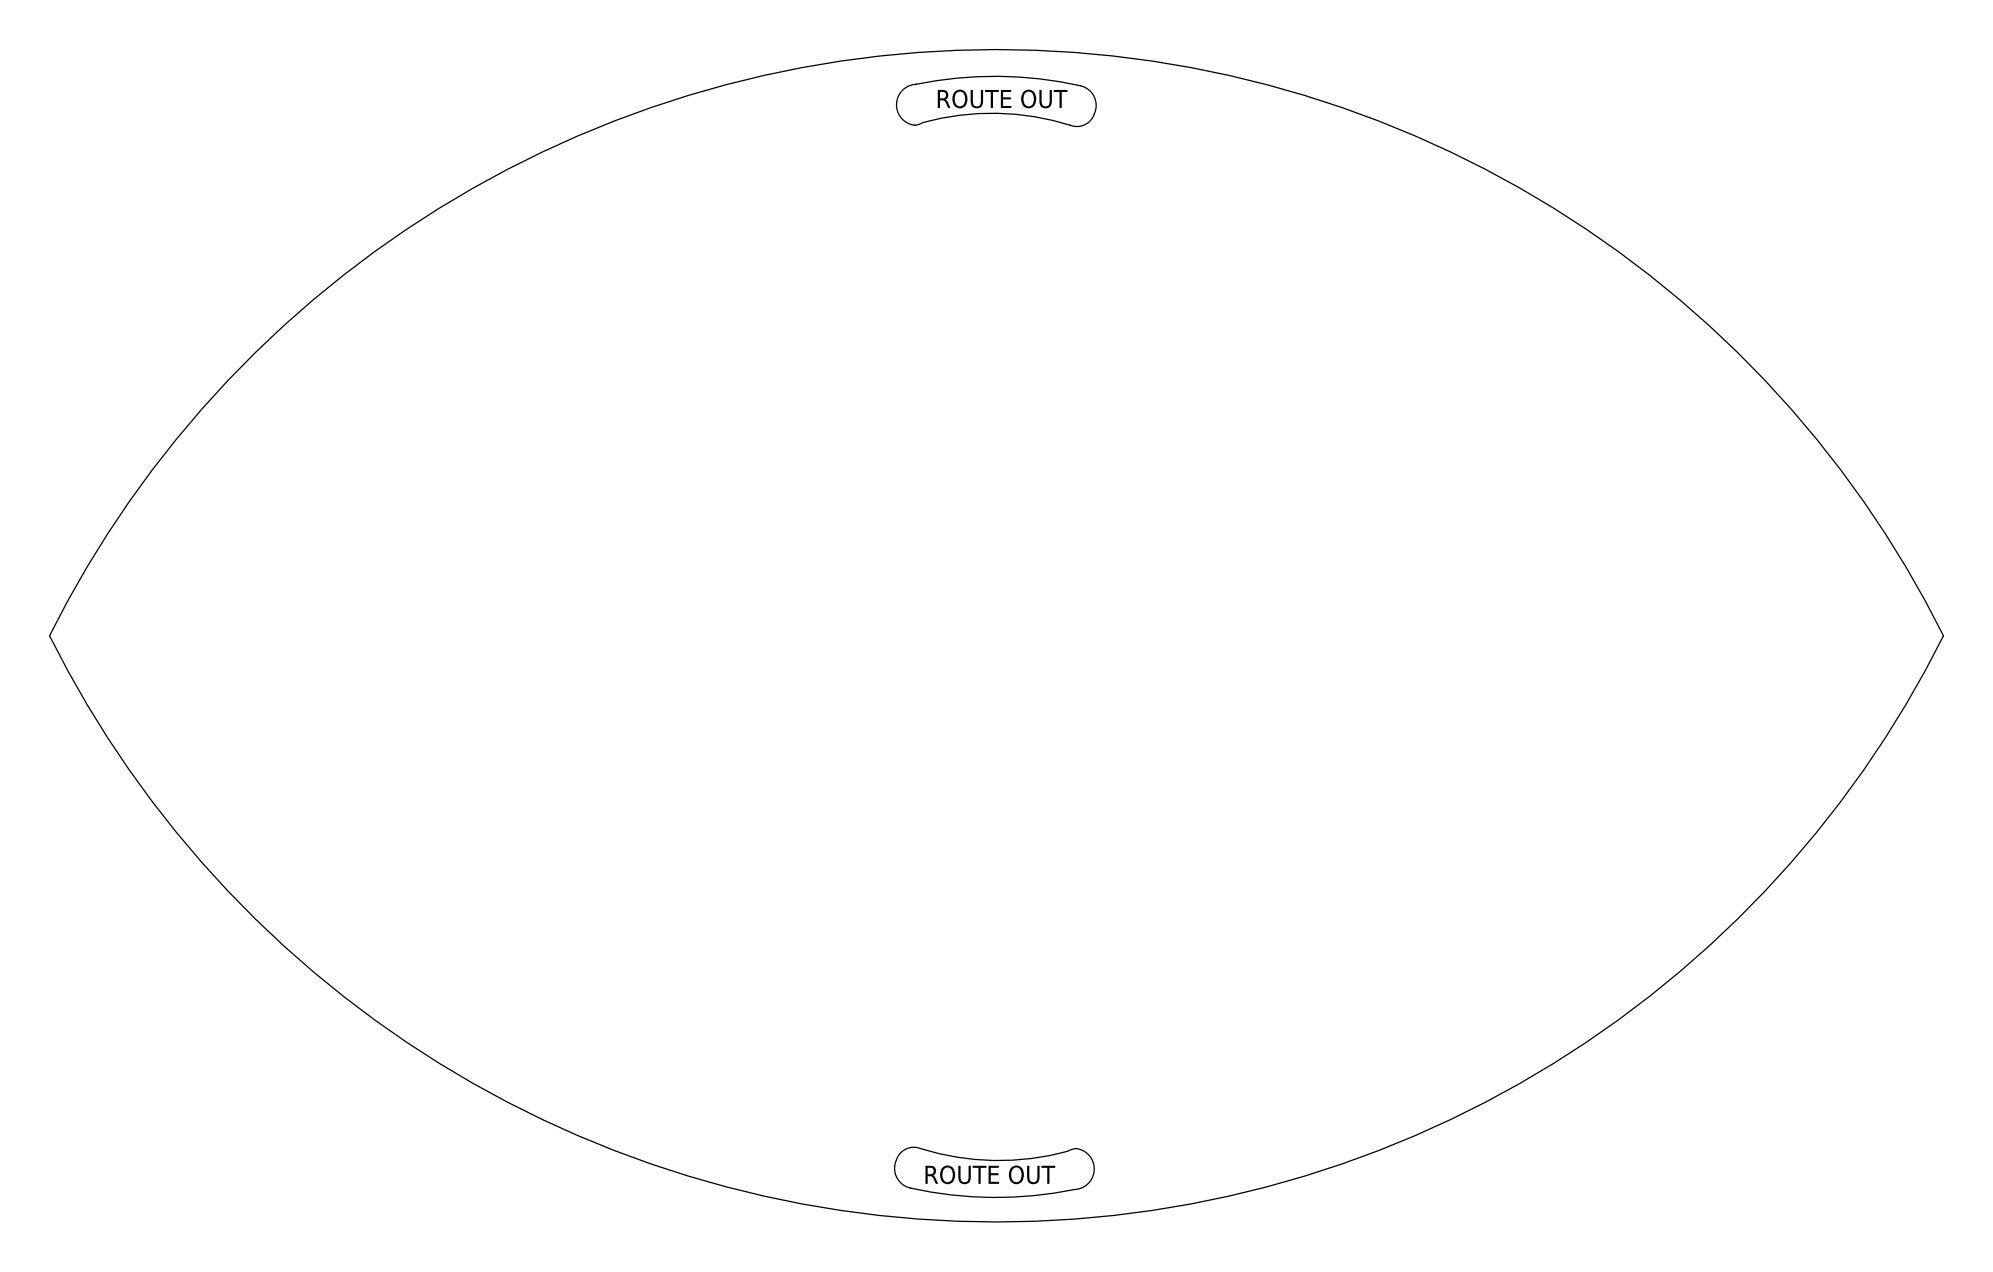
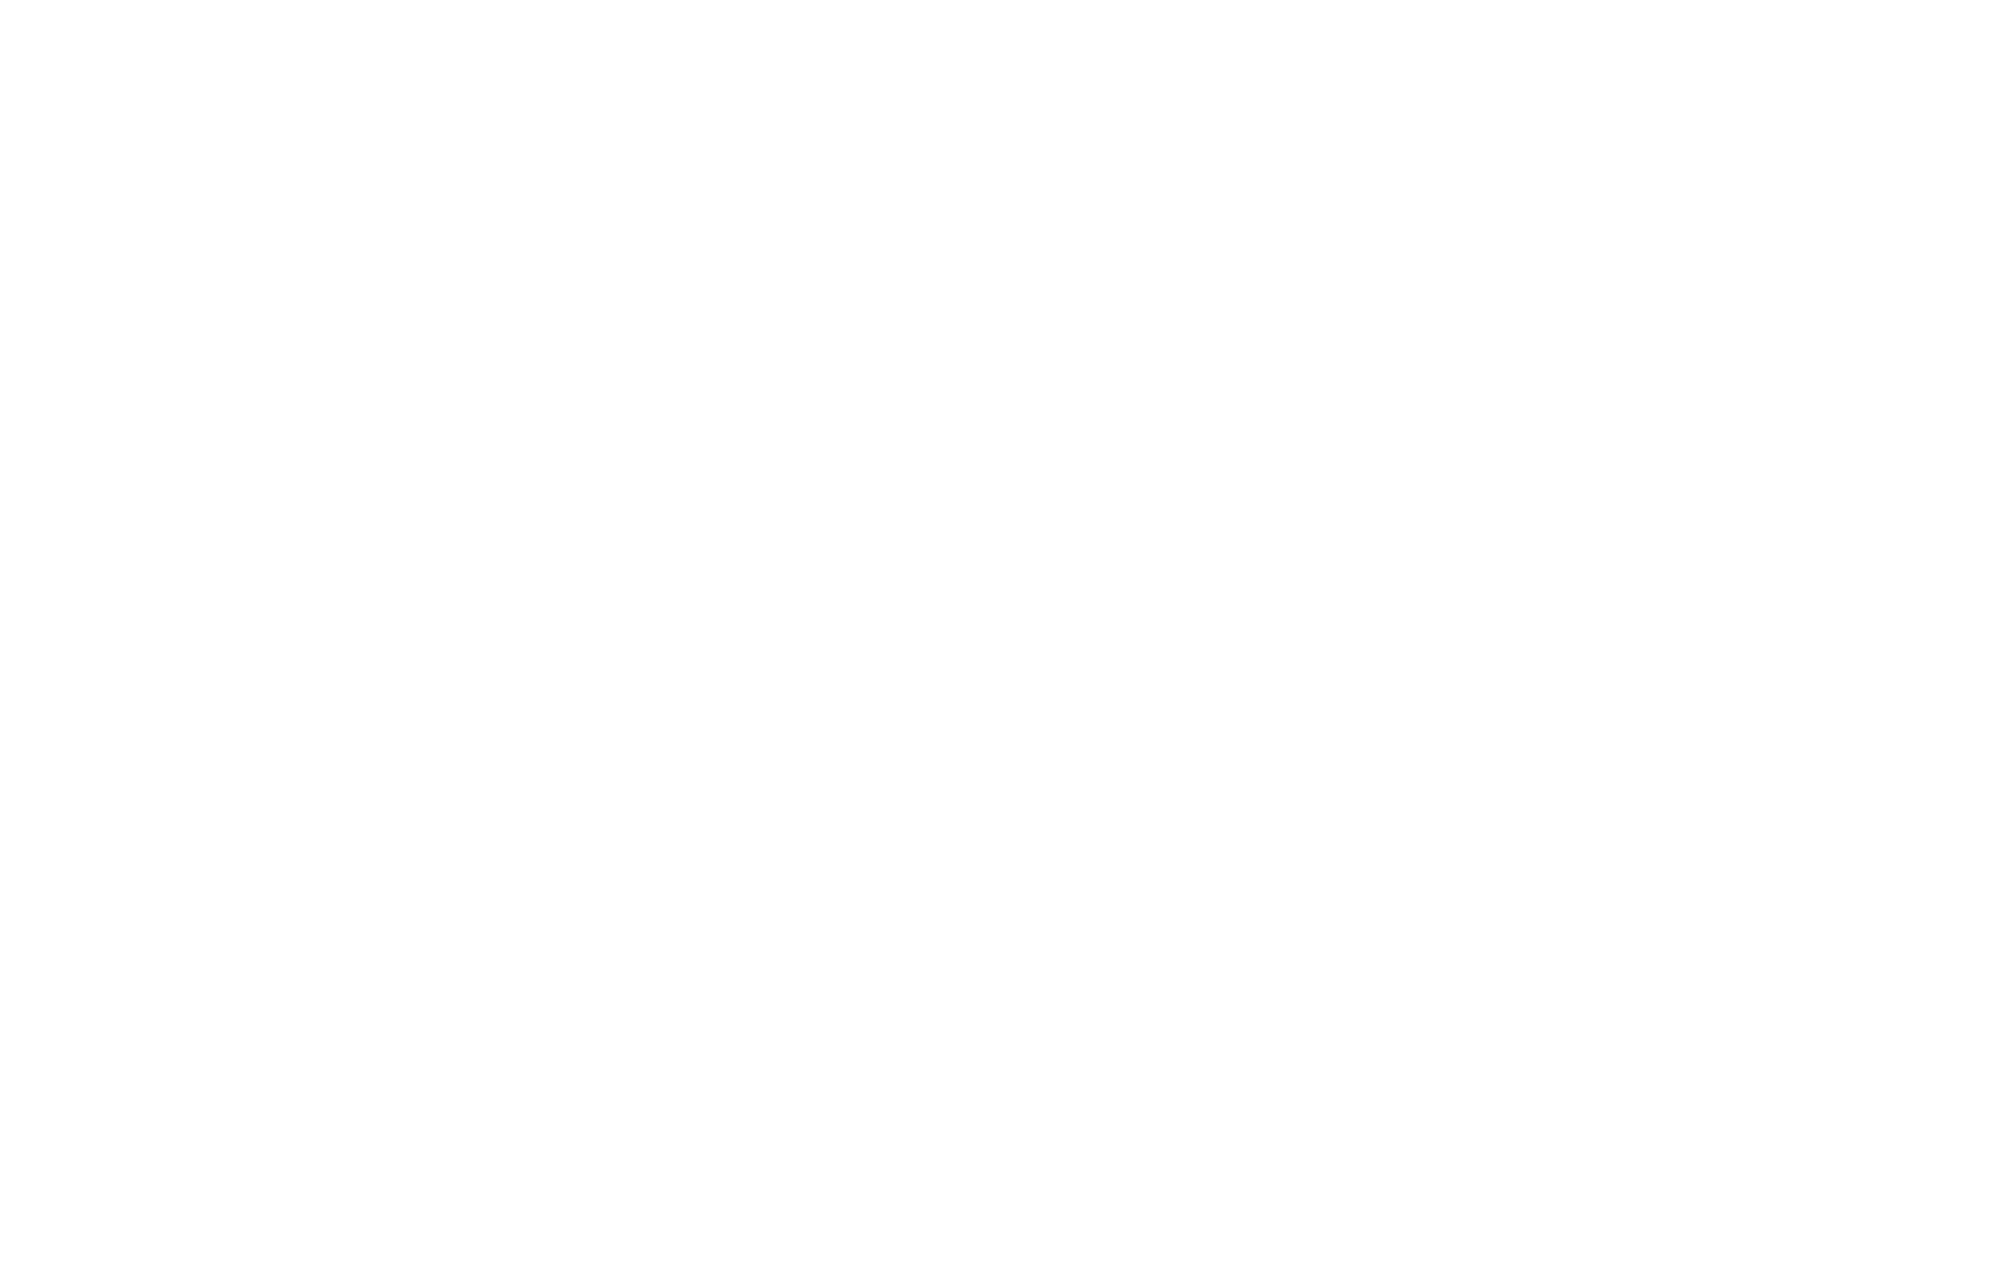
board edge: (916, 84) (977, 76) (1039, 78) (1085, 87) (1094, 96) (1095, 109) (1089, 121) (1078, 126) (1034, 116) (996, 113) (959, 115) (914, 125) (901, 118) (896, 104) (902, 90) (916, 84) -> none
text: ROUTE OUT (1002, 98) -> none
board edge: (49, 635) (86, 567) (129, 501) (201, 409) (255, 352) (313, 299) (374, 251) (439, 207) (507, 169) (578, 135) (651, 107) (725, 84) (840, 61) (918, 52) (996, 49) (1074, 52) (1152, 61) (1267, 84) (1341, 107) (1414, 135) (1485, 169) (1553, 207) (1618, 251) (1679, 299) (1737, 352) (1791, 409) (1863, 501) (1906, 567) (1943, 635) (1906, 704) (1863, 770) (1791, 862) (1737, 919) (1679, 971) (1618, 1019) (1553, 1063) (1485, 1102) (1414, 1135) (1341, 1164) (1267, 1186) (1152, 1210) (1074, 1219) (996, 1221) (918, 1219) (840, 1210) (725, 1186) (651, 1164) (578, 1135) (507, 1102) (439, 1063) (374, 1019) (313, 971) (255, 919) (201, 862) (129, 770) (86, 704) (49, 635) -> none
board edge: (920, 1148) (910, 1147) (899, 1154) (894, 1167) (898, 1179) (908, 1187) (951, 1194) (992, 1197) (1054, 1193) (1084, 1186) (1089, 1181) (1094, 1172) (1093, 1164) (1089, 1155) (1075, 1148) (1030, 1158) (993, 1160) (956, 1157) (920, 1148) -> none
text: ROUTE OUT (990, 1174) -> none

